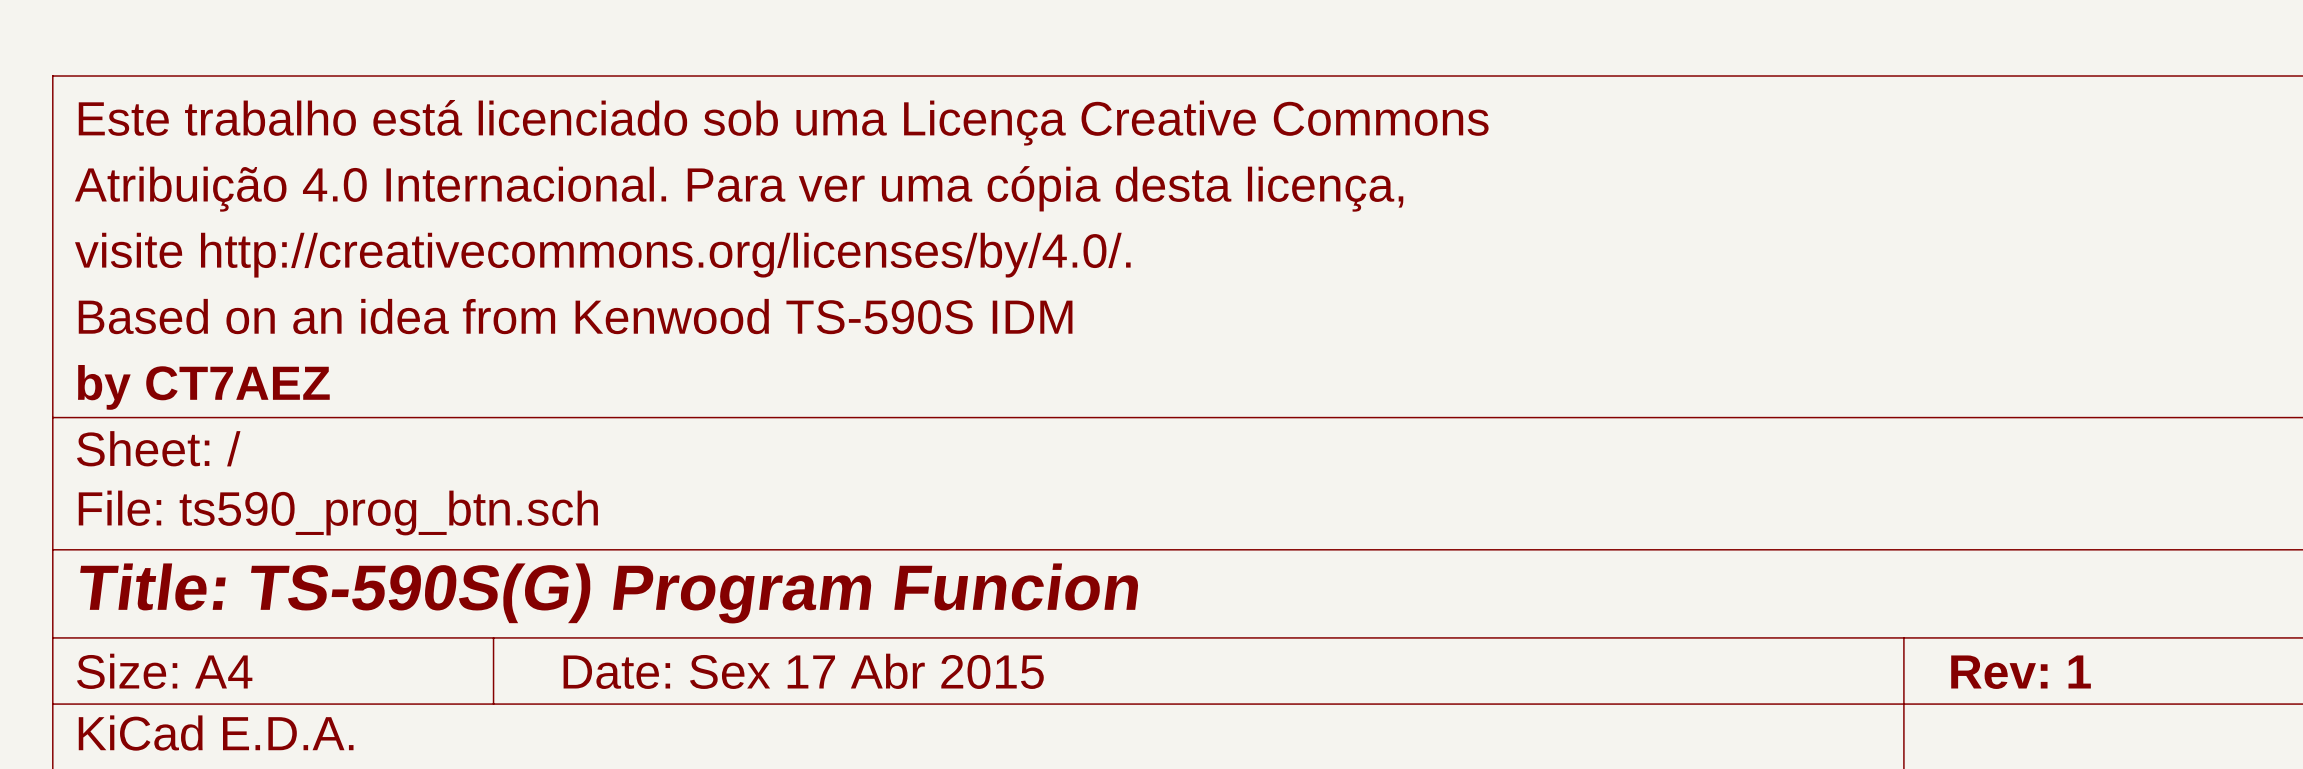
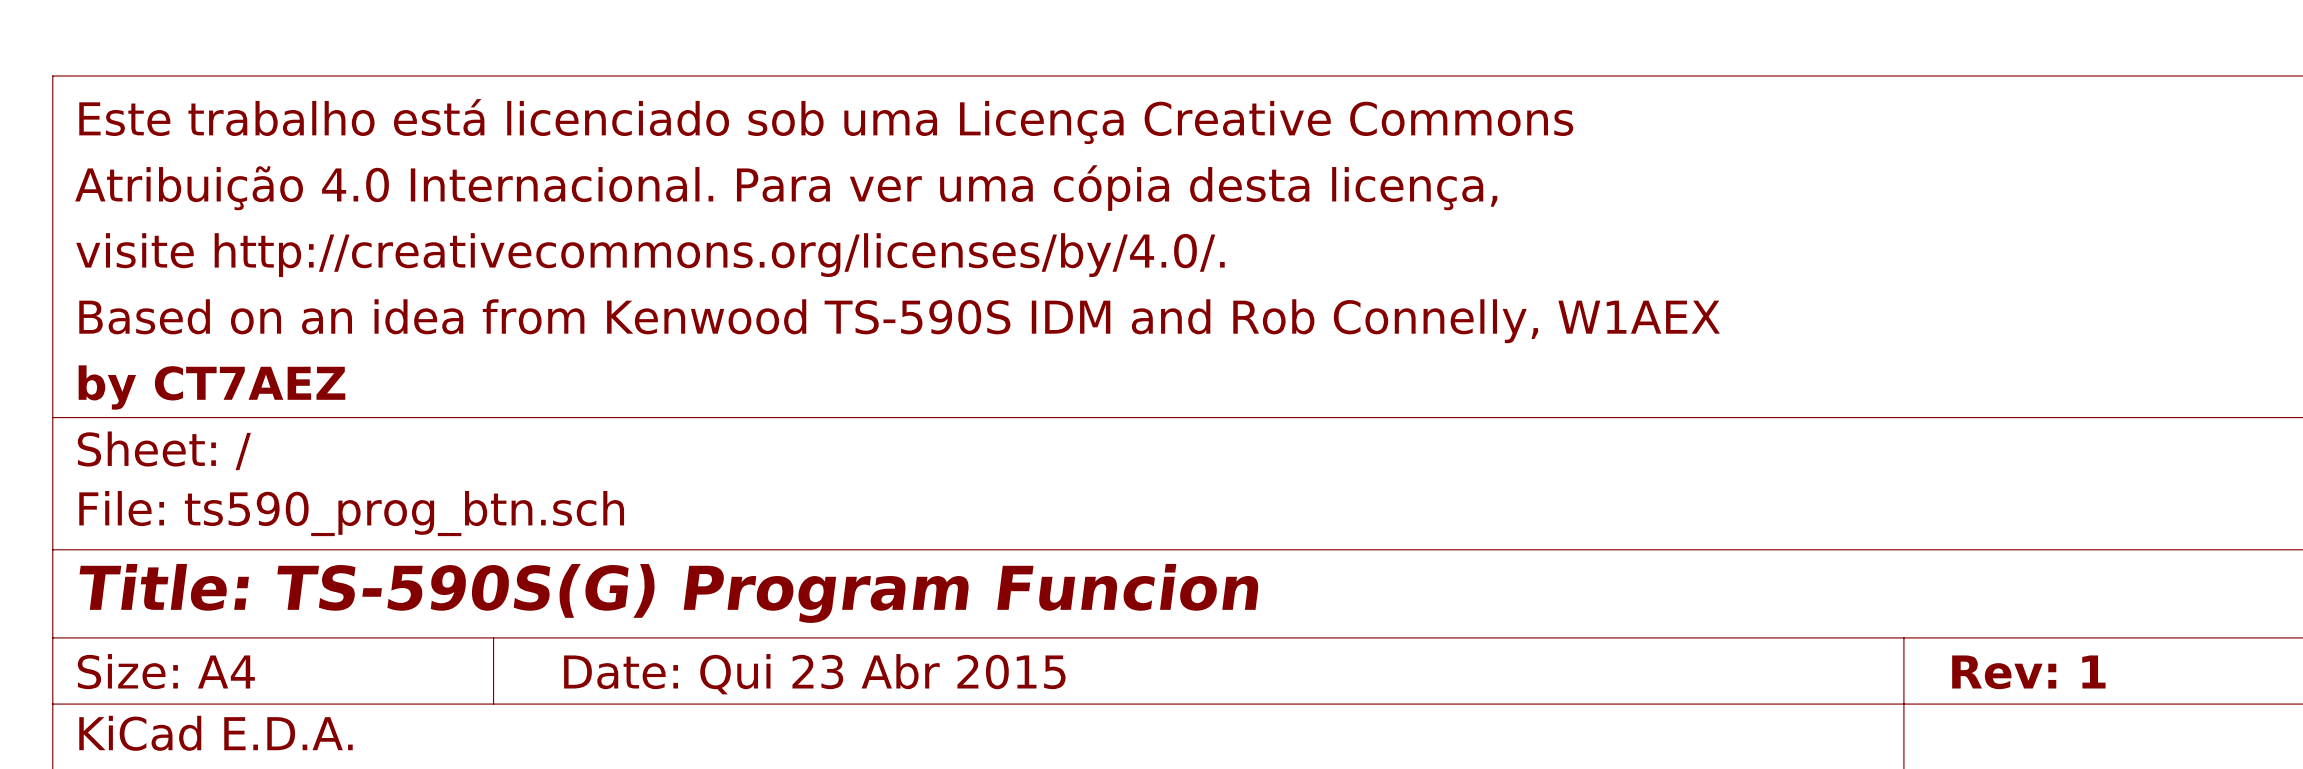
title block: Based on an idea from Kenwood TS-590S IDM (575, 316) -> Based on an idea from Kenwood TS-590S IDM and Rob Connelly, W1AEX (899, 321)
title block: Date: Sex 17 Abr 2015 (803, 671) -> Date: Qui 23 Abr 2015 (814, 674)

